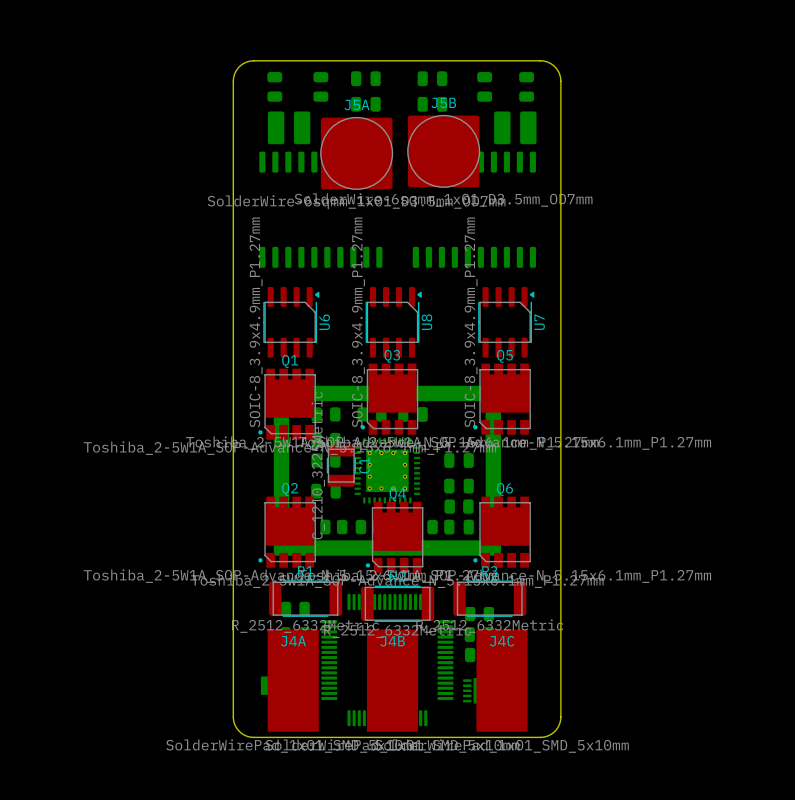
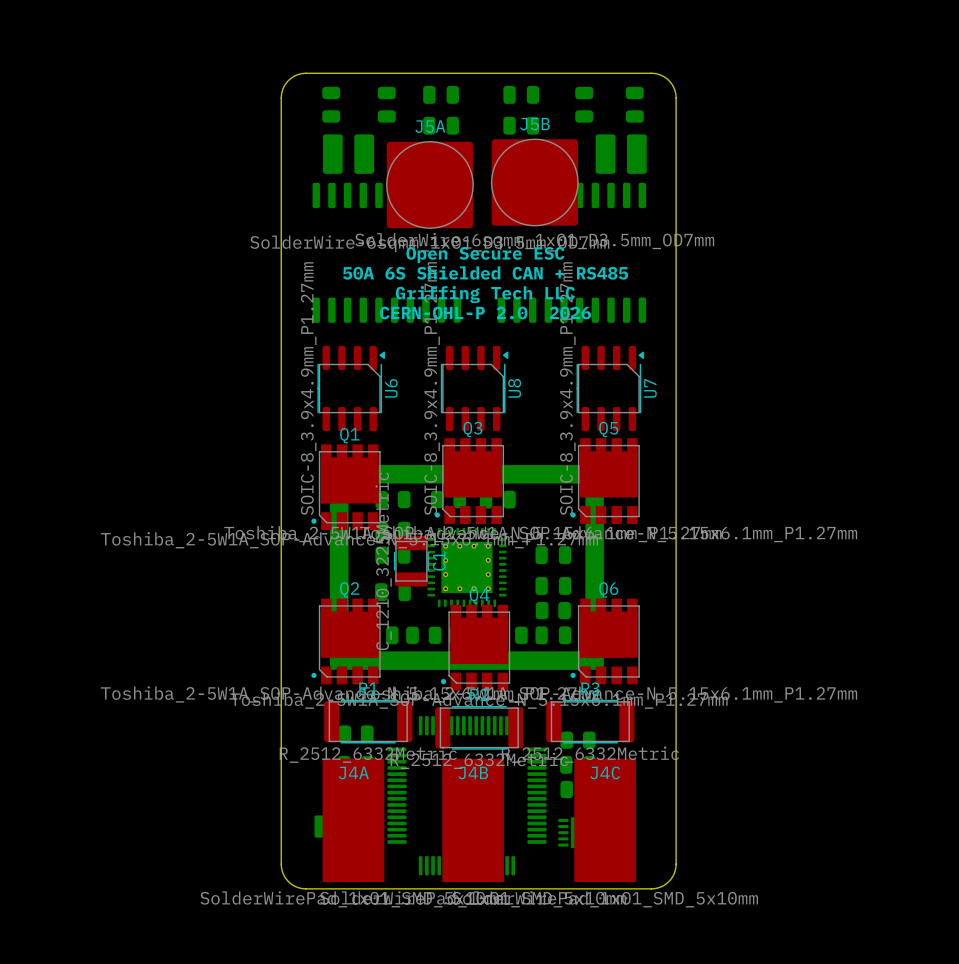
text: none -> Open Secure ESC (485, 255)
text: none -> 50A 6S Shielded CAN + RS485 (485, 272)
text: none -> Griffing Tech LLC (485, 294)
text: none -> CERN-OHL-P 2.0 2026 (485, 312)

